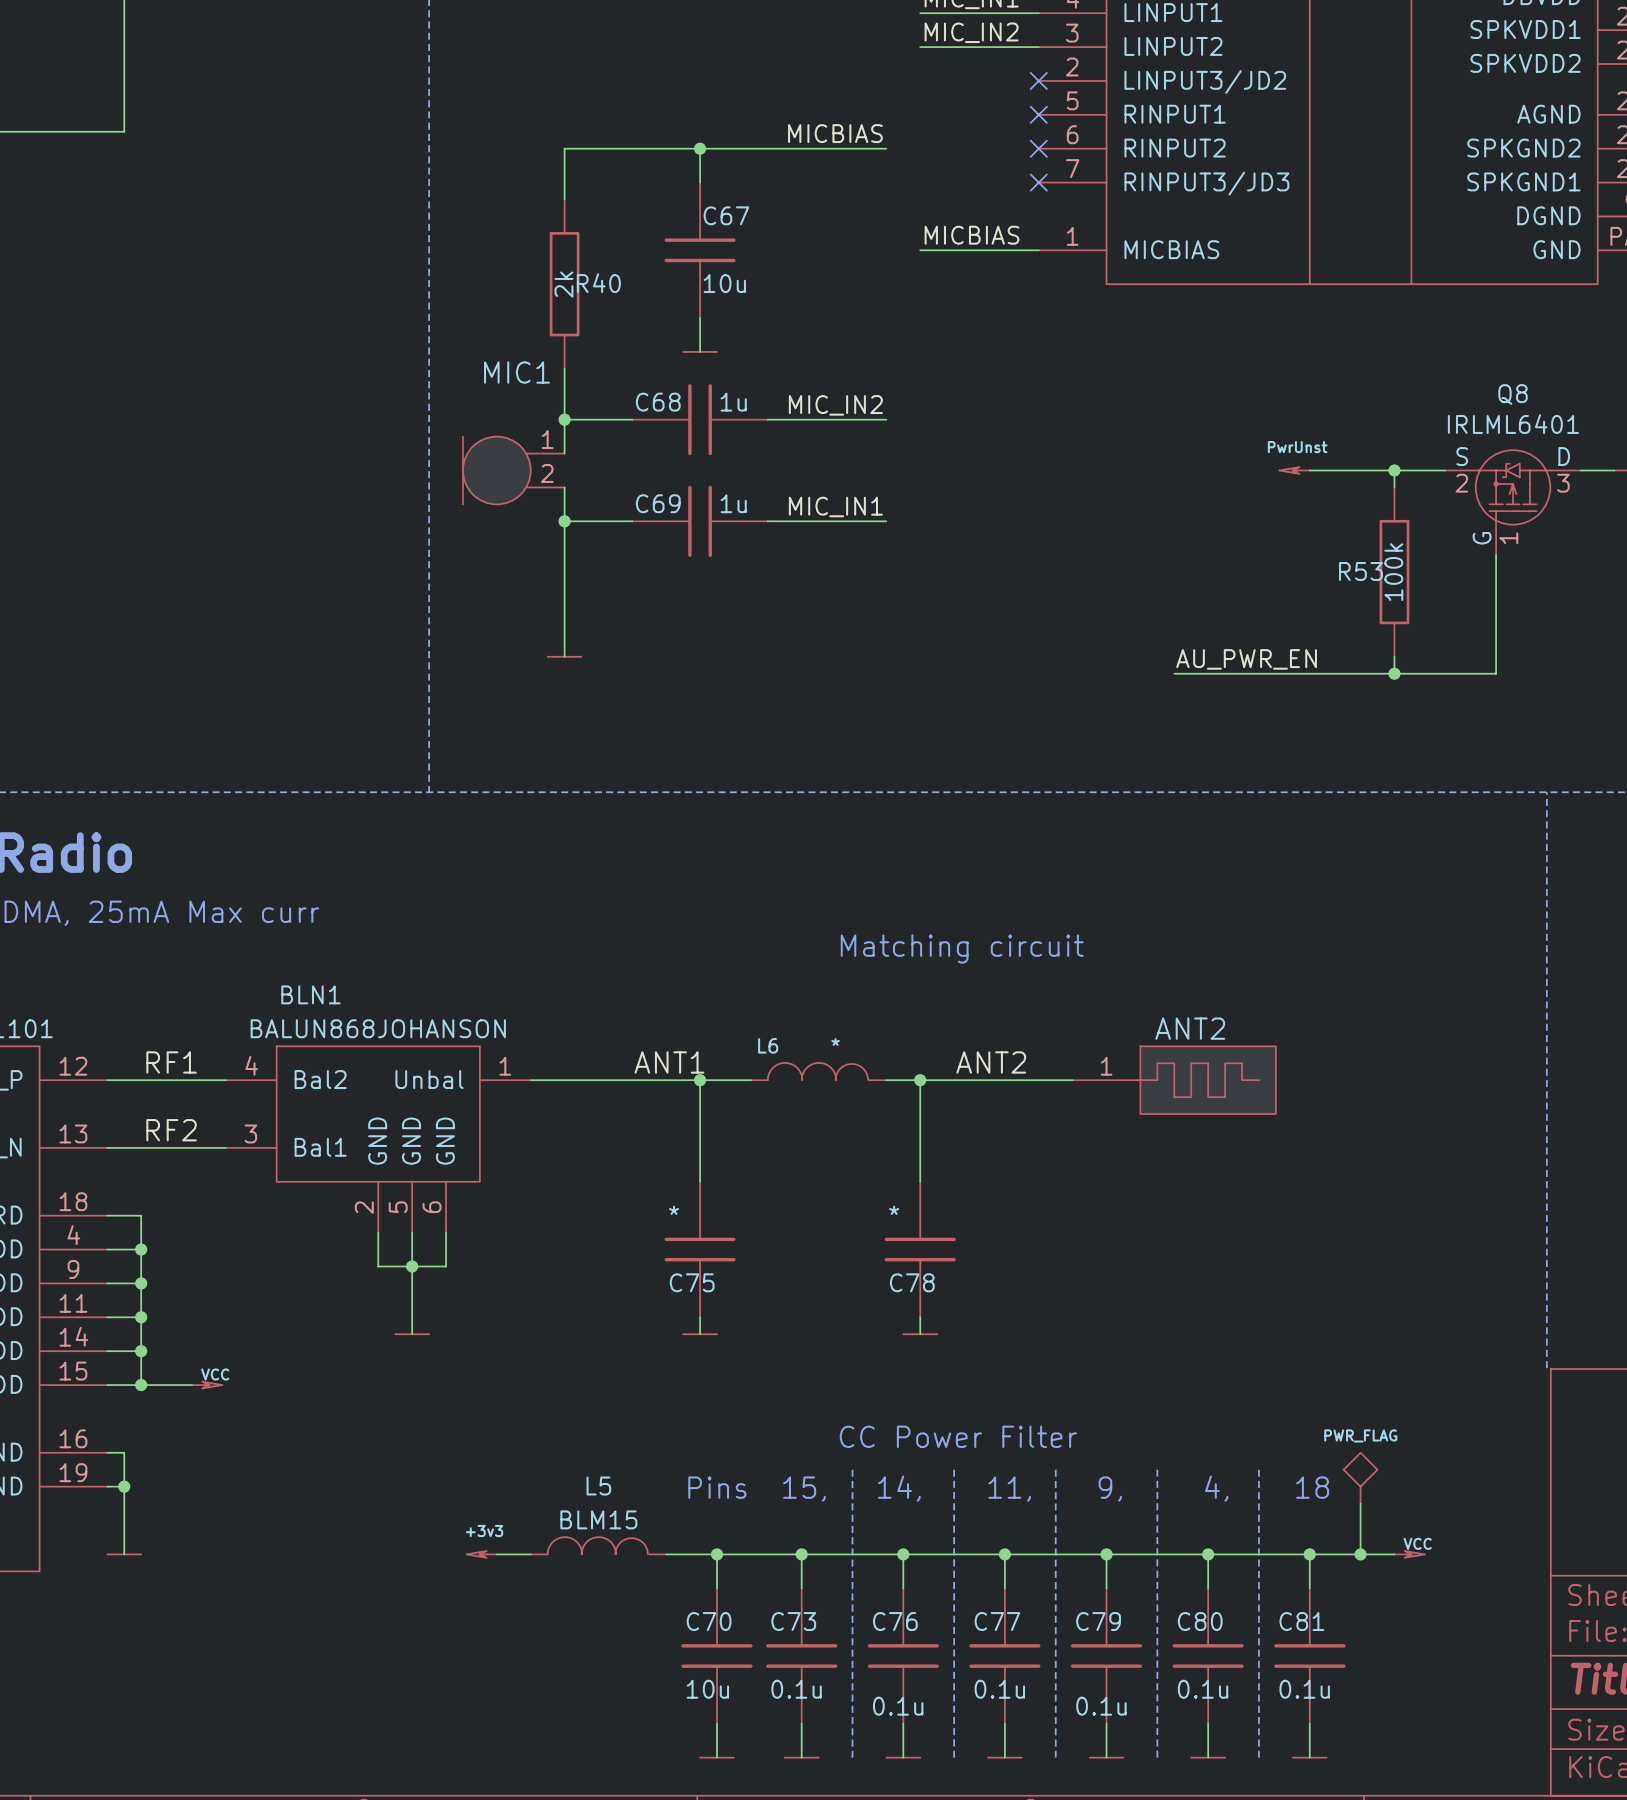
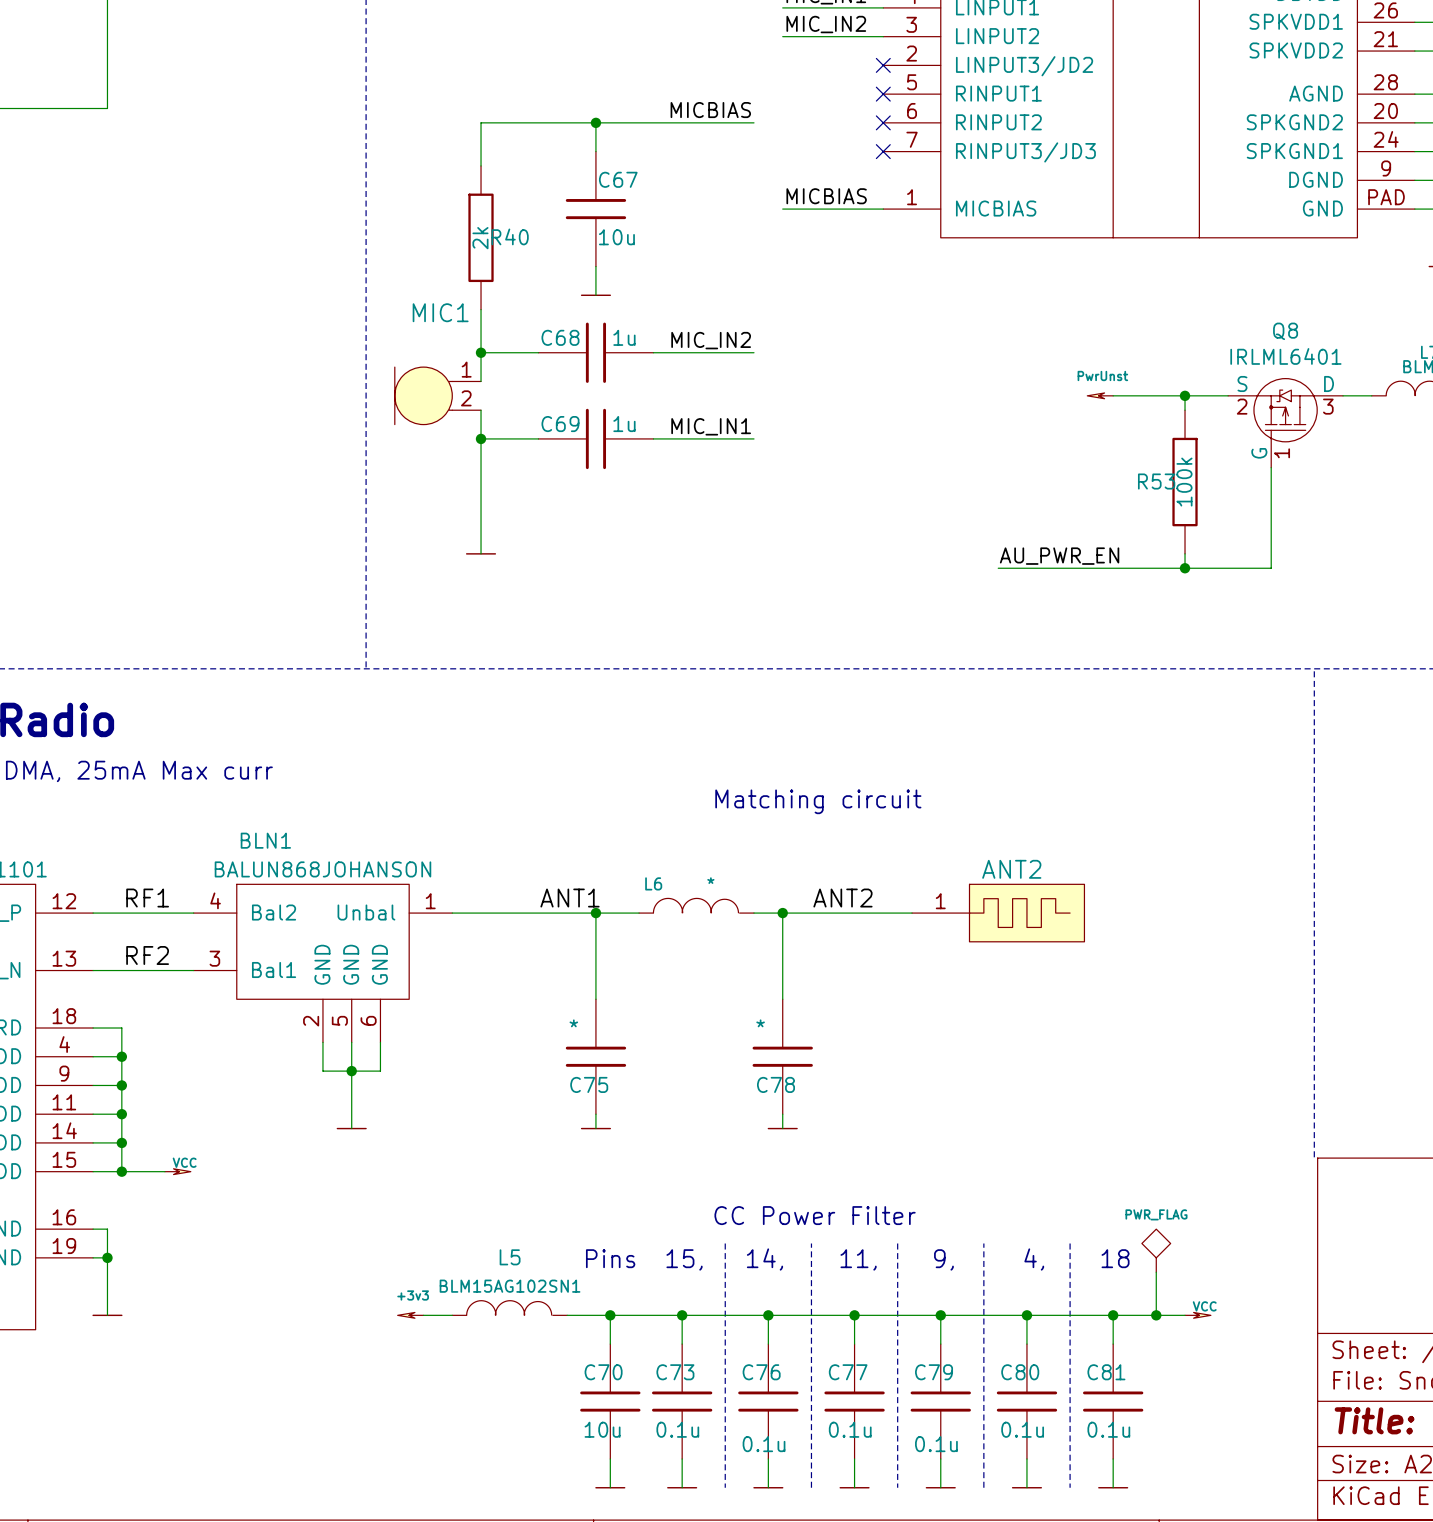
L5 value: BLM15 (598, 1519) -> BLM15AG102SN1 (510, 1286)

